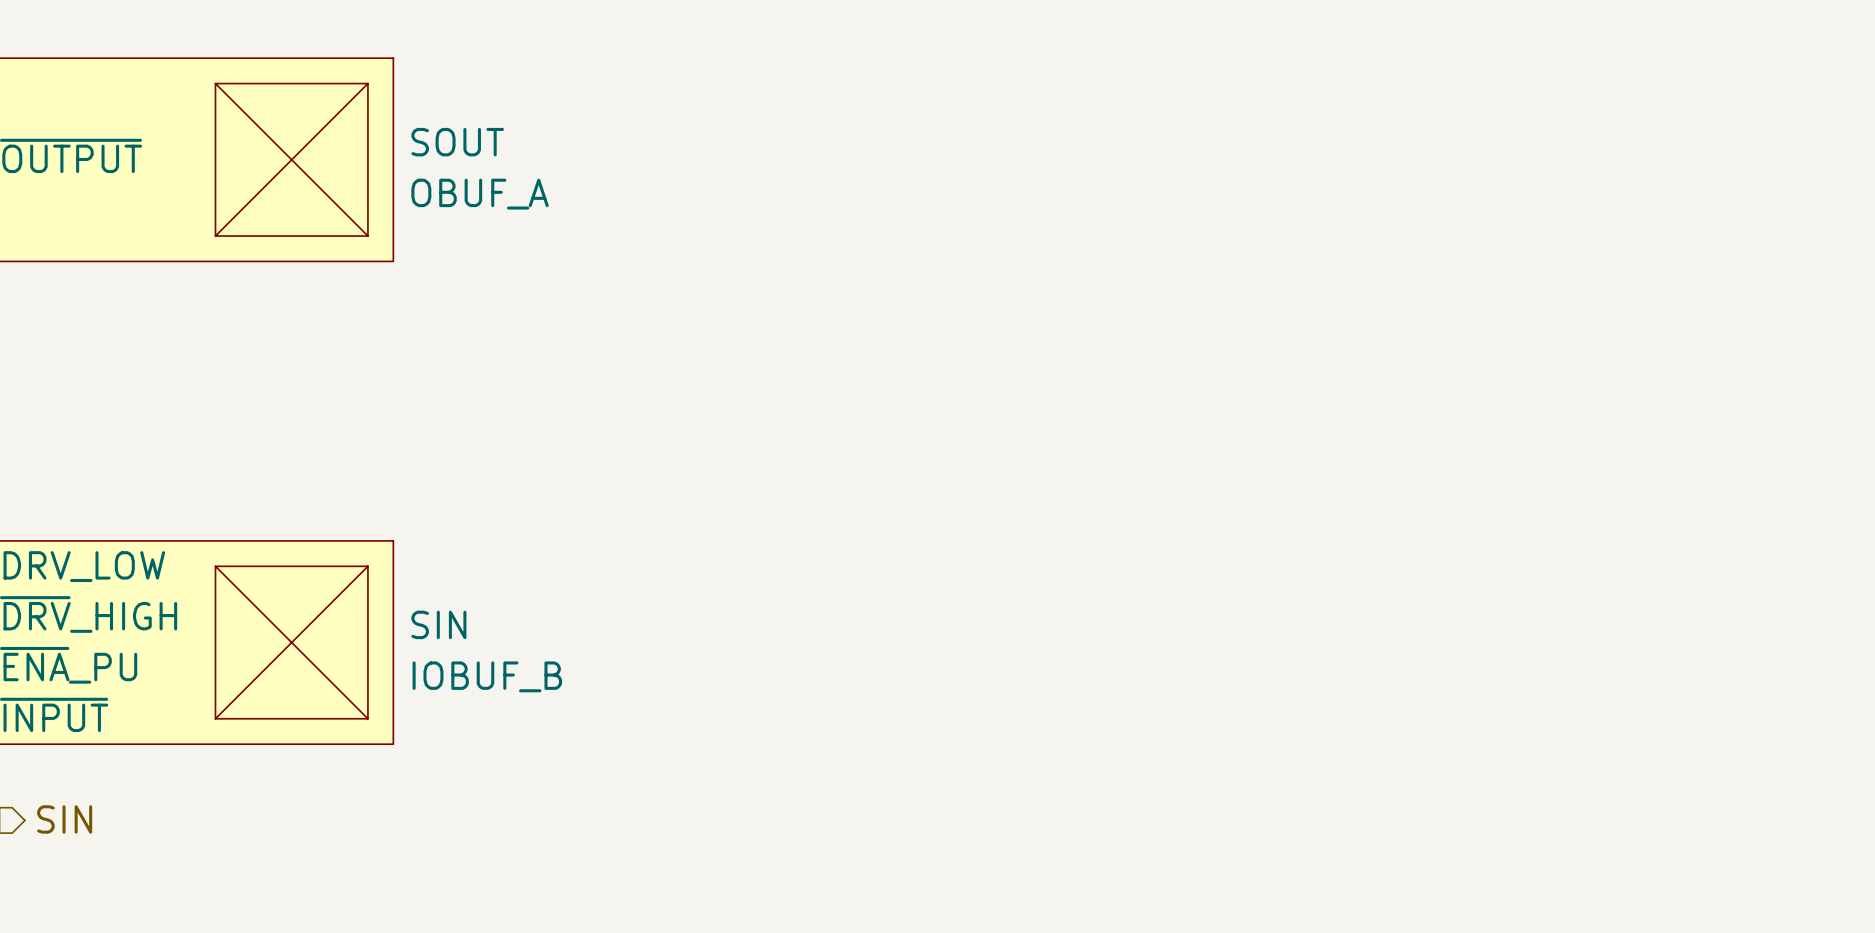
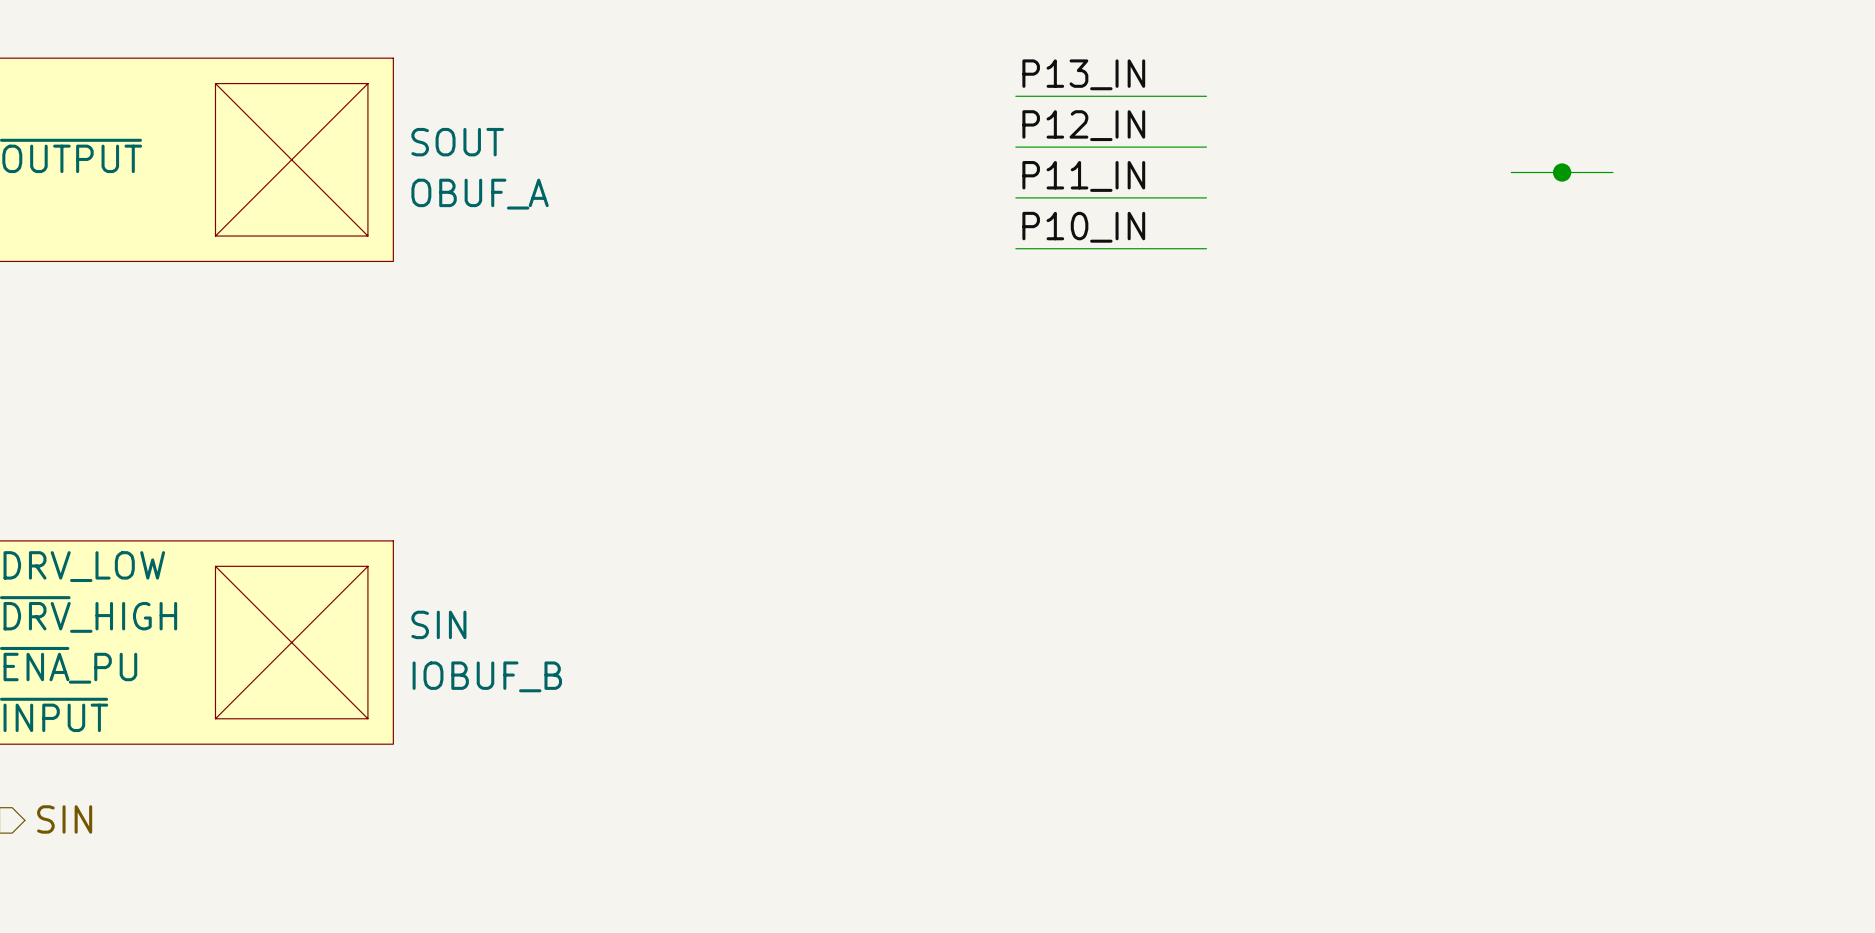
label: none -> P13_IN (1083, 74)
wire: none -> (1015, 96) (1206, 96)
label: none -> P12_IN (1083, 125)
wire: none -> (1015, 147) (1206, 147)
wire: none -> (1511, 172) (1612, 172)
junction: none -> (1562, 172)
label: none -> P11_IN (1083, 176)
wire: none -> (1015, 197) (1206, 197)
label: none -> P10_IN (1083, 227)
wire: none -> (1015, 248) (1206, 248)

